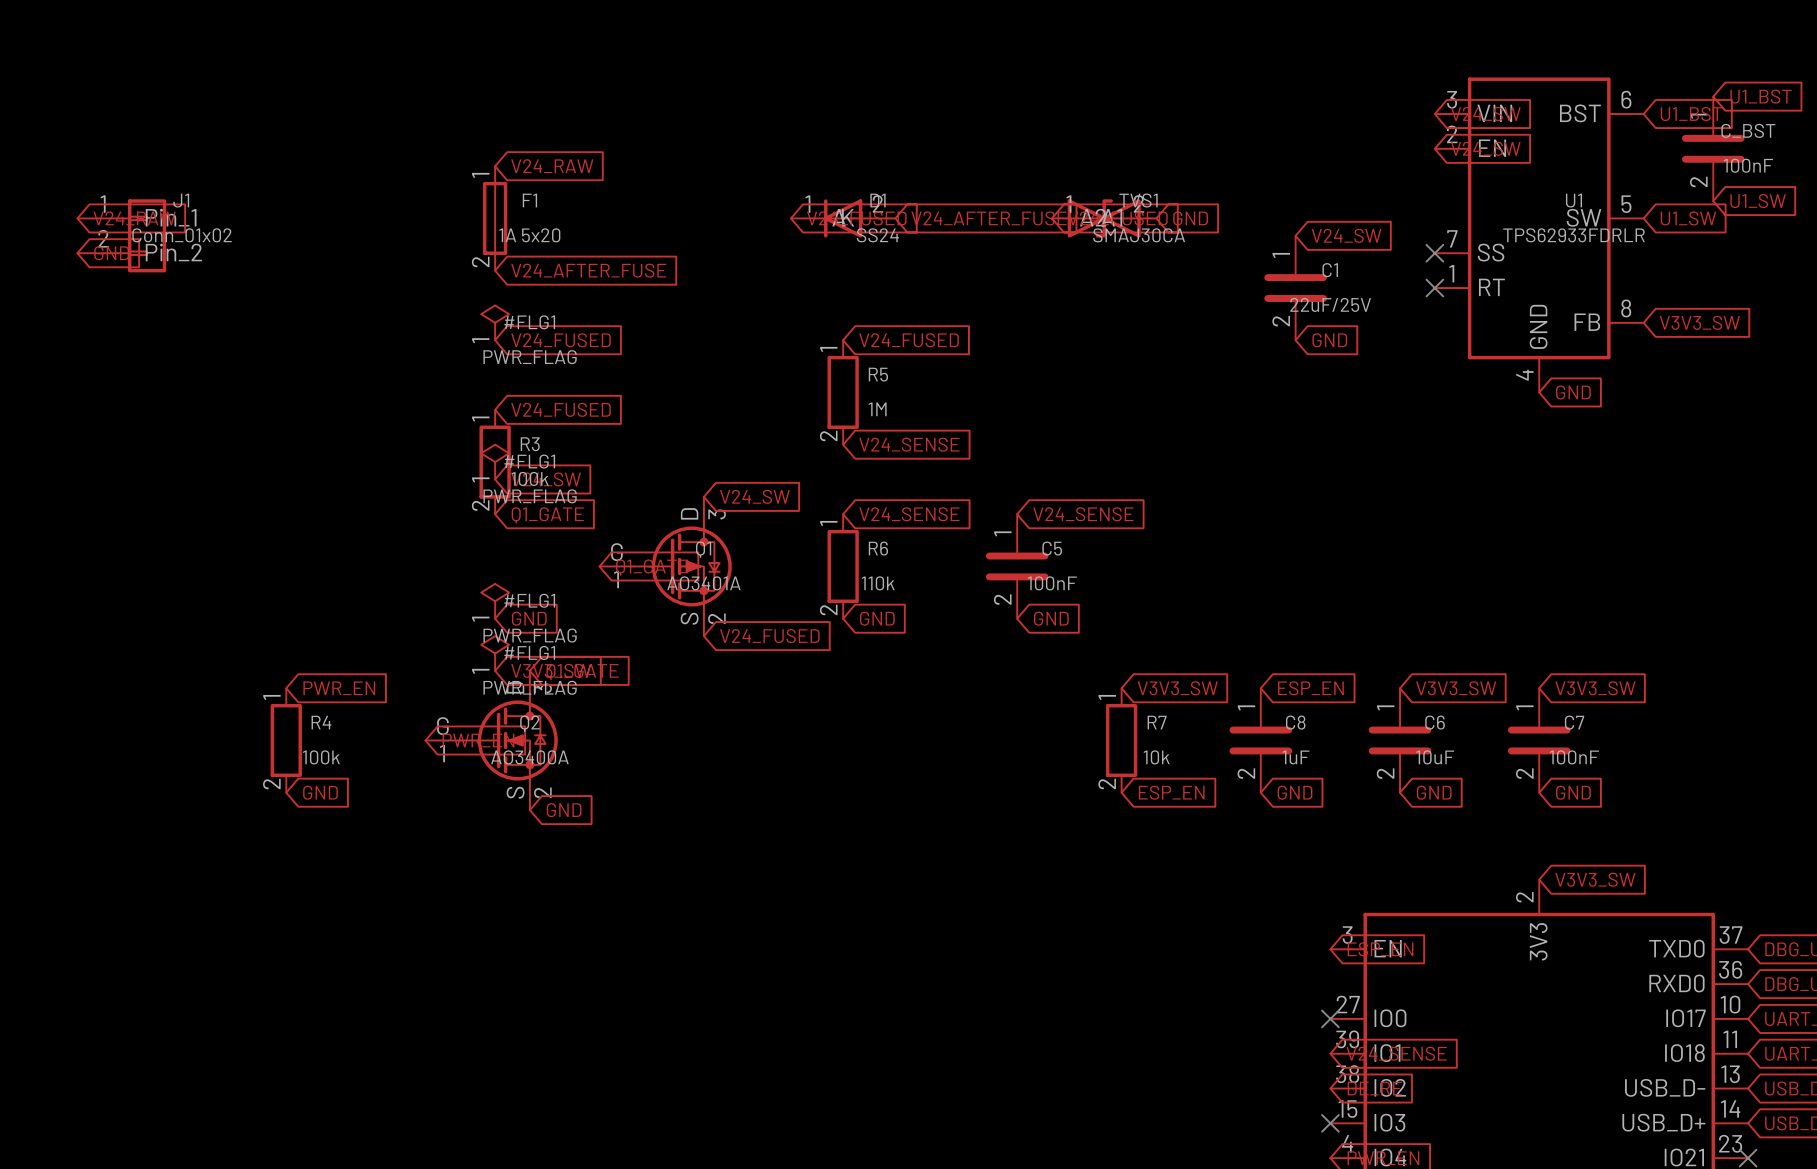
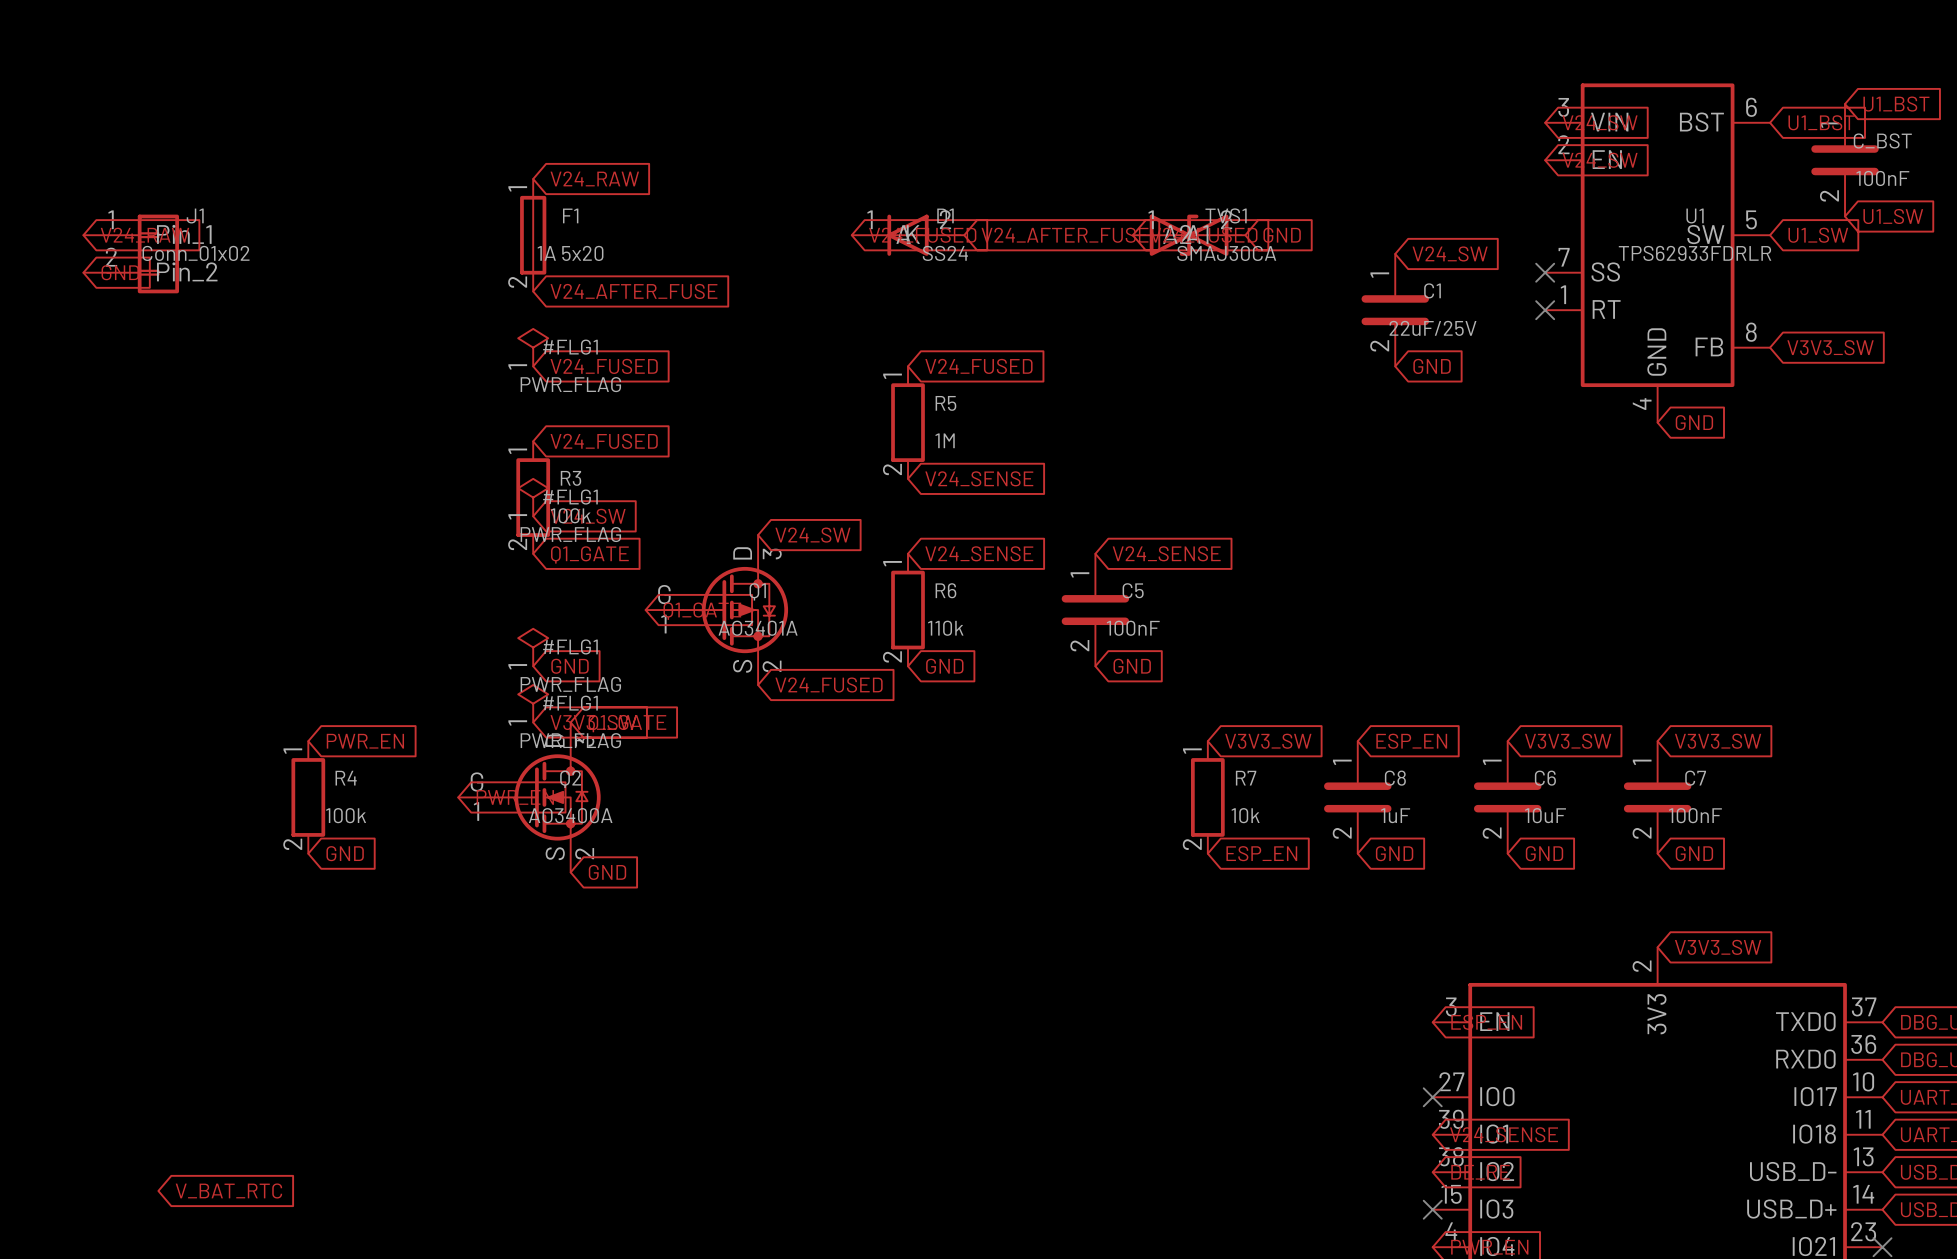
global label: none -> V_BAT_RTC (228, 1190)

